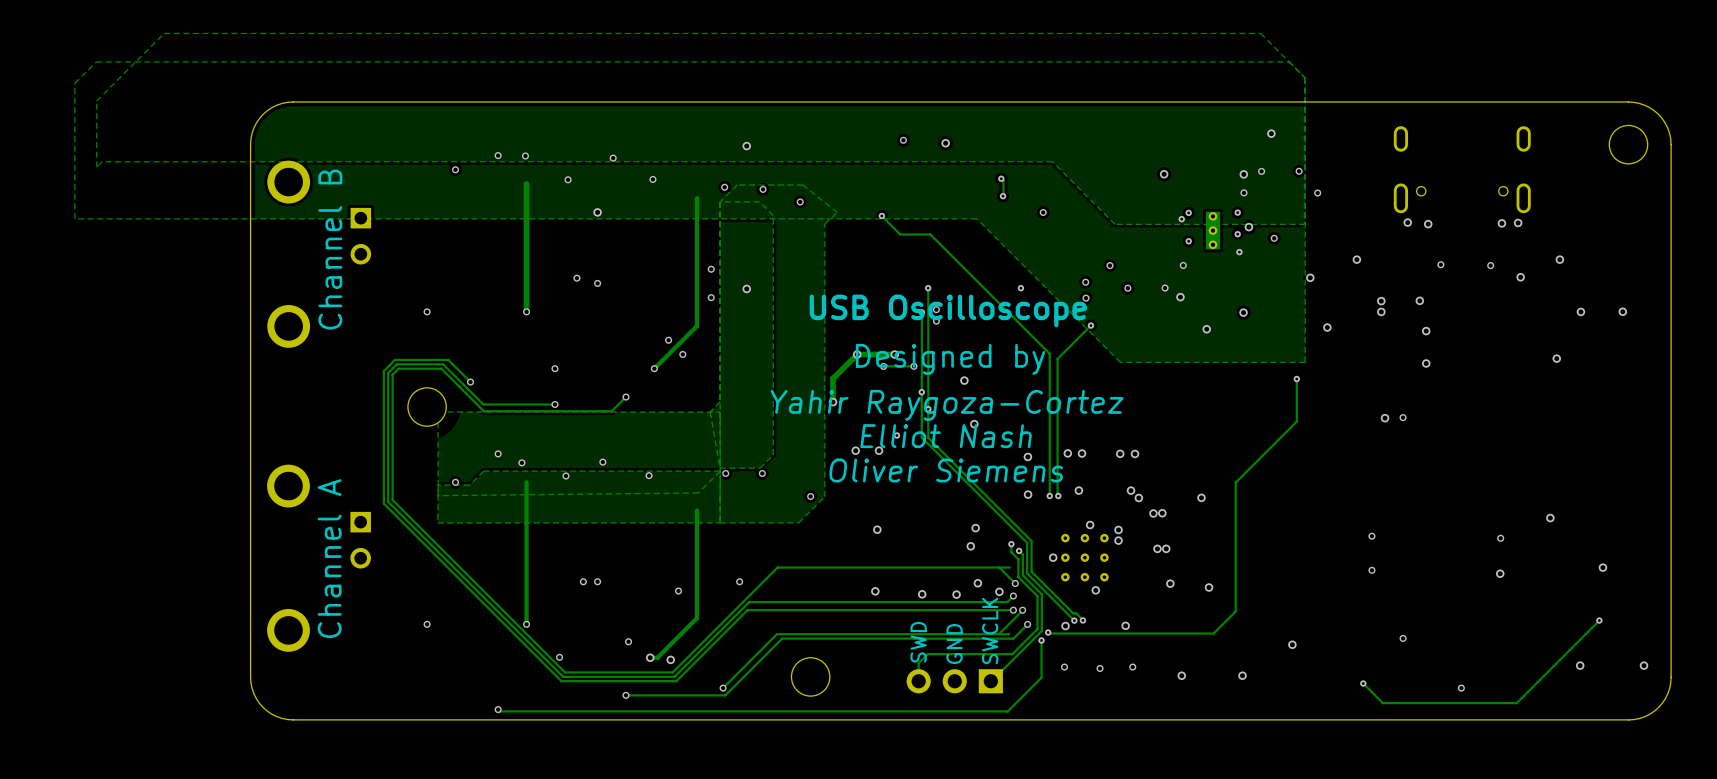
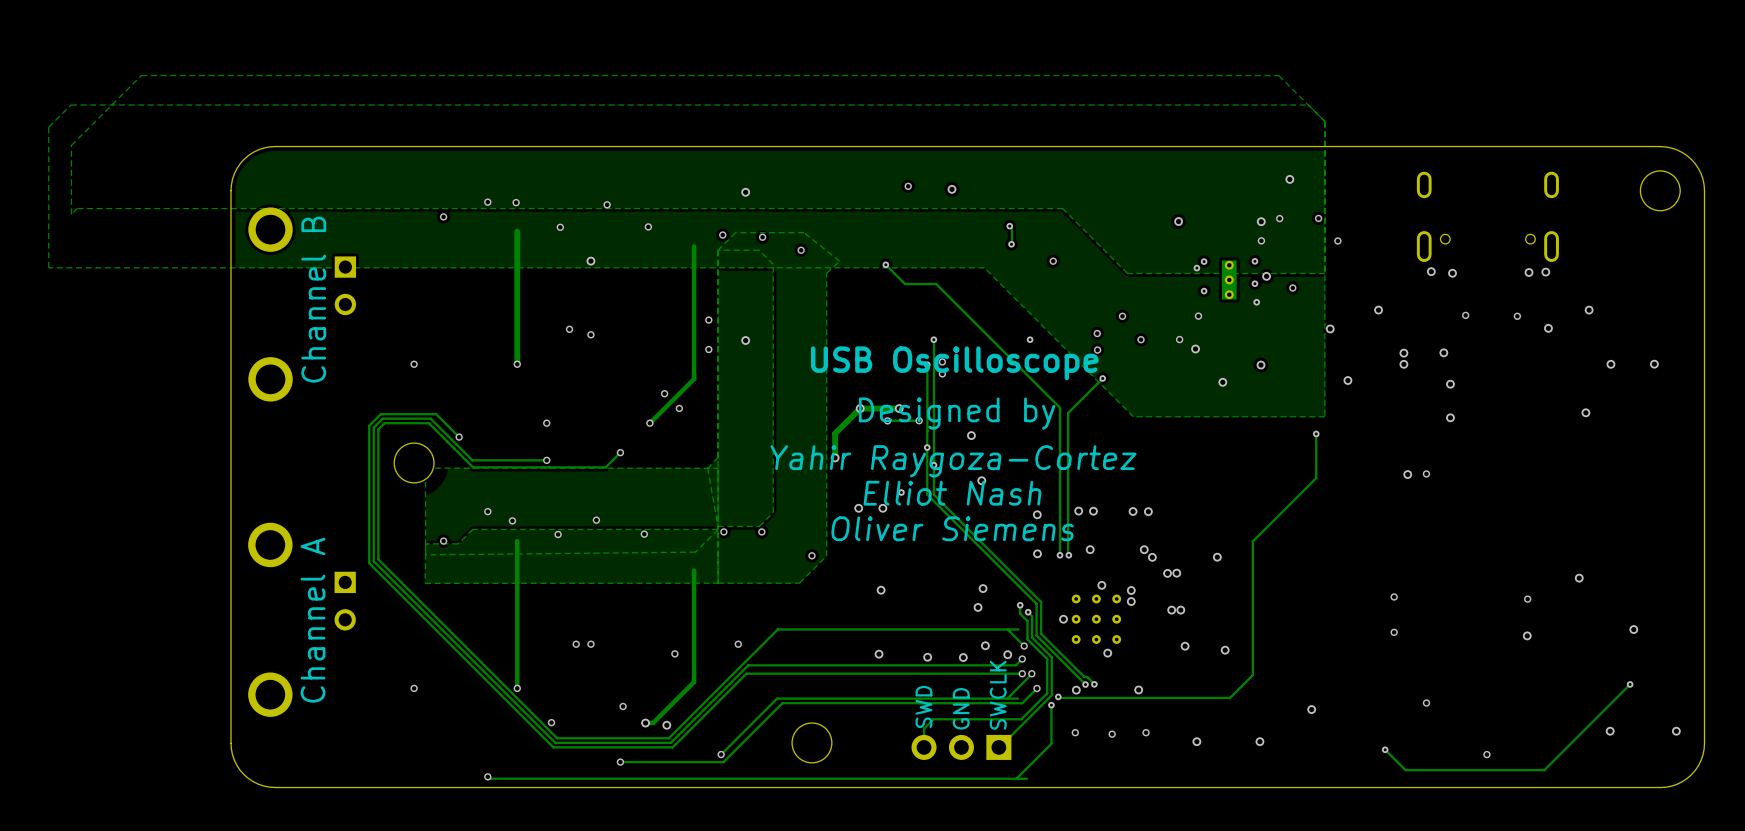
track: none -> (1027, 778) (1016, 778)

